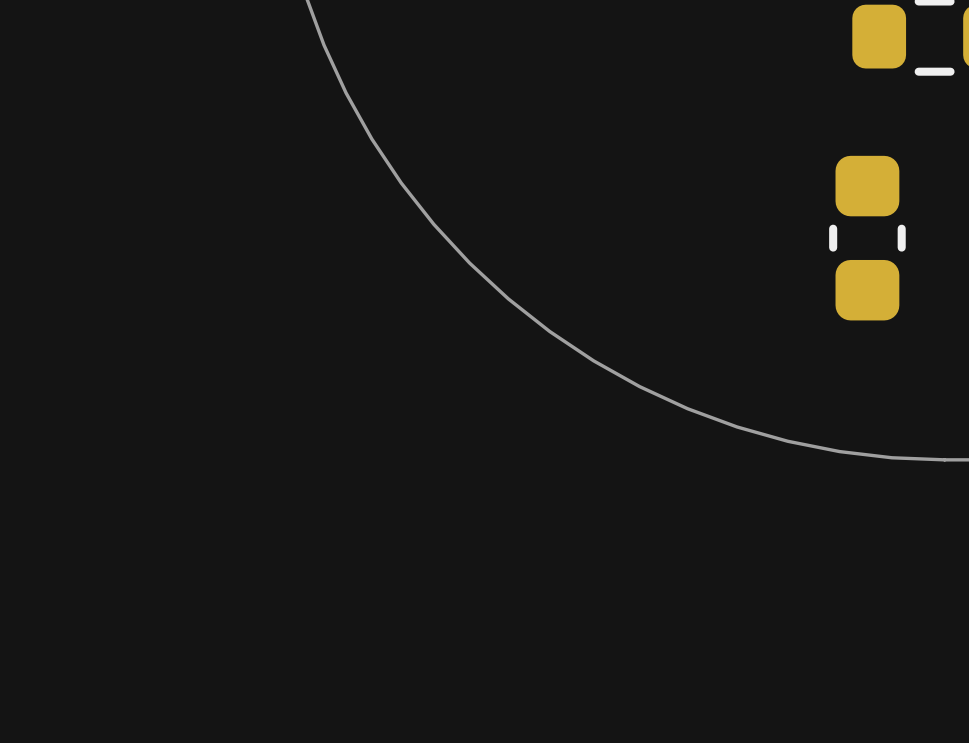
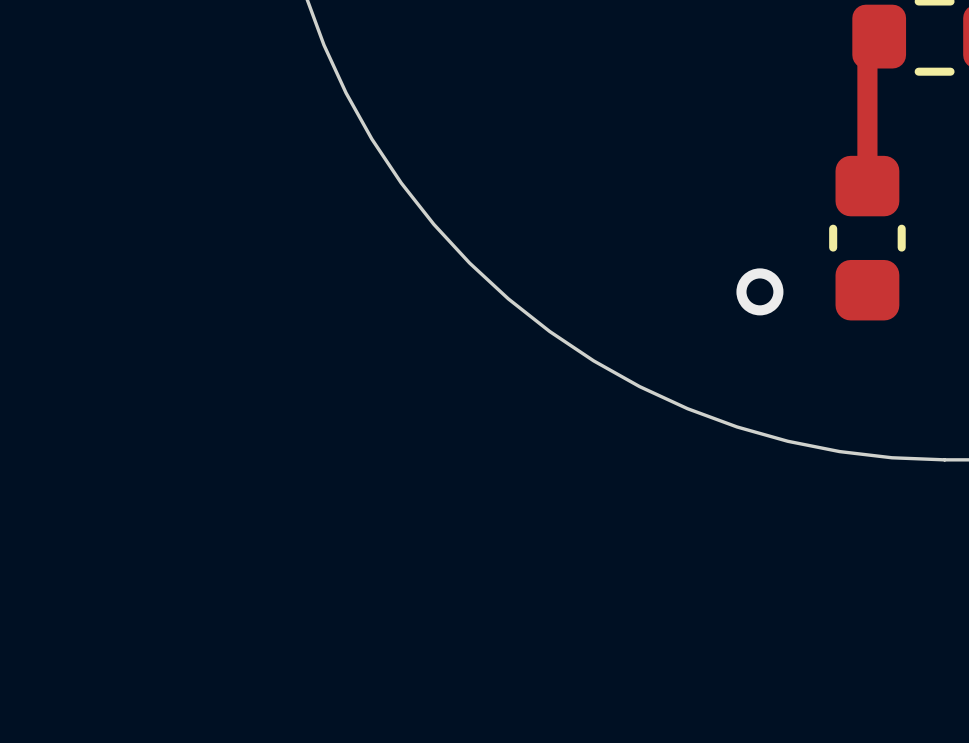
track: none -> (879, 36) (867, 48) (867, 186)
via: none -> (759, 291)

